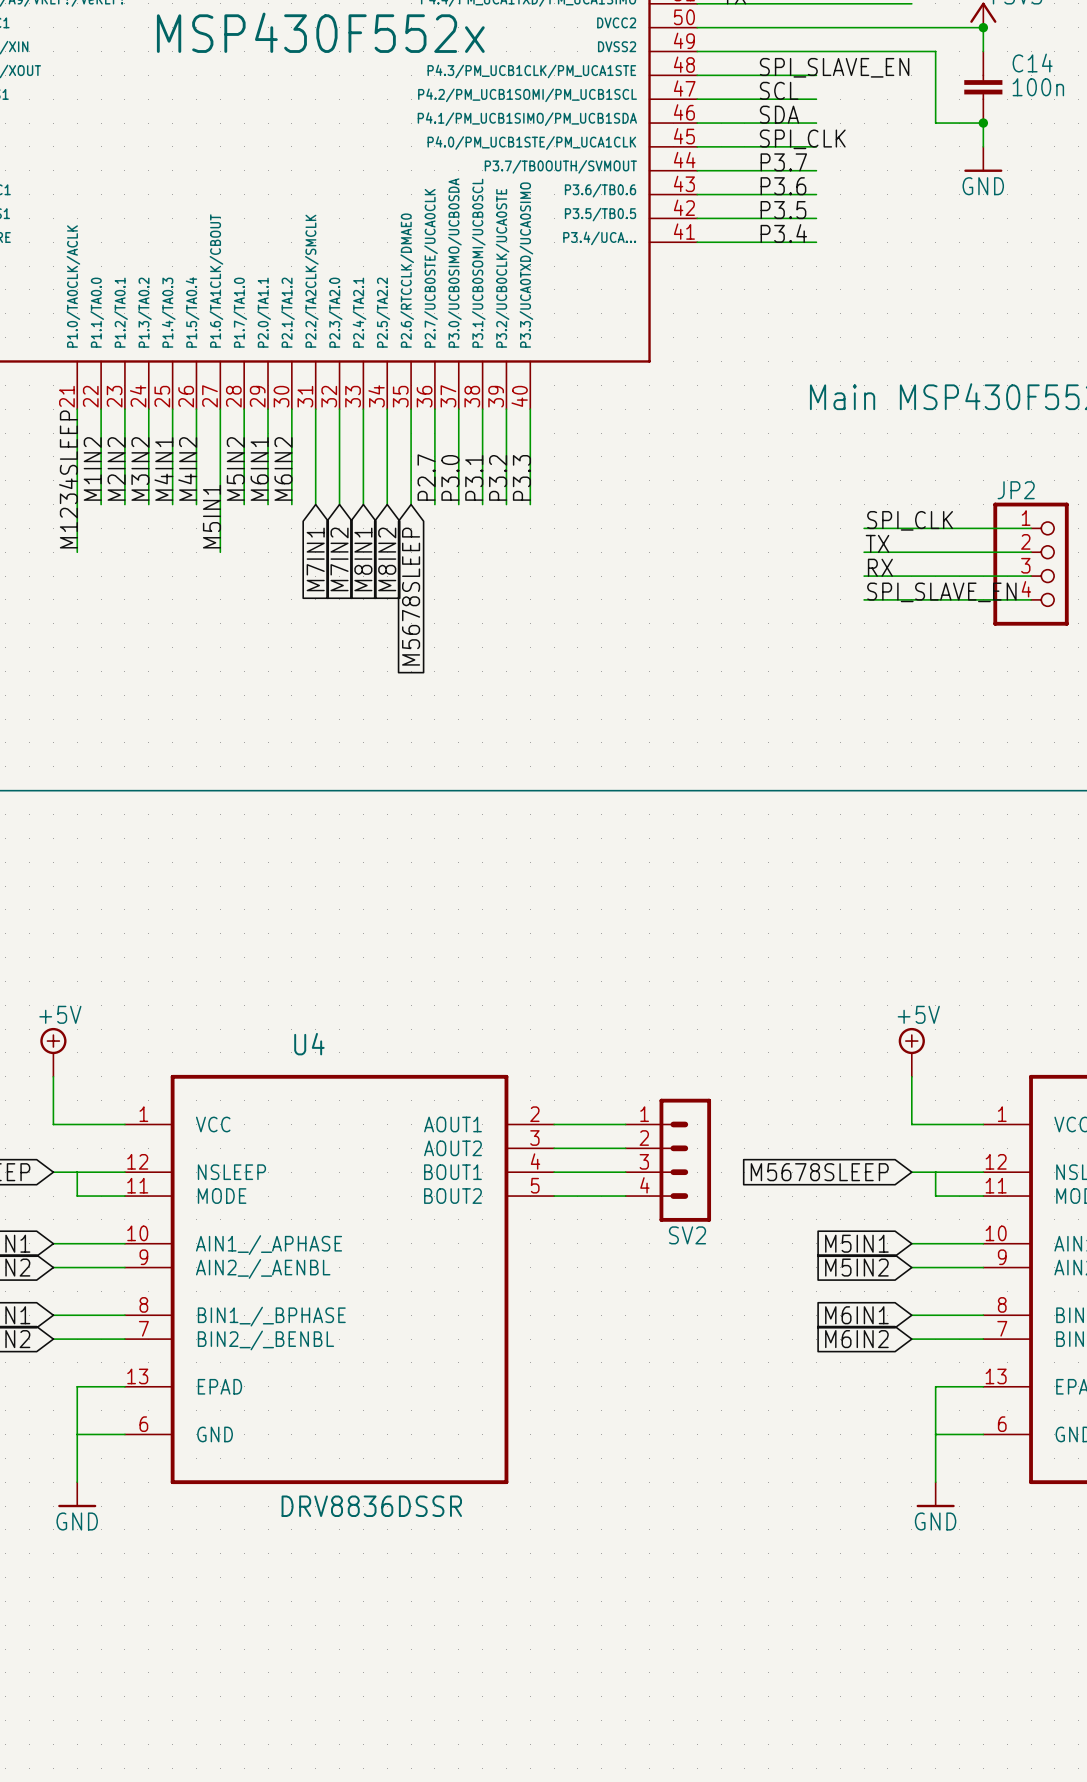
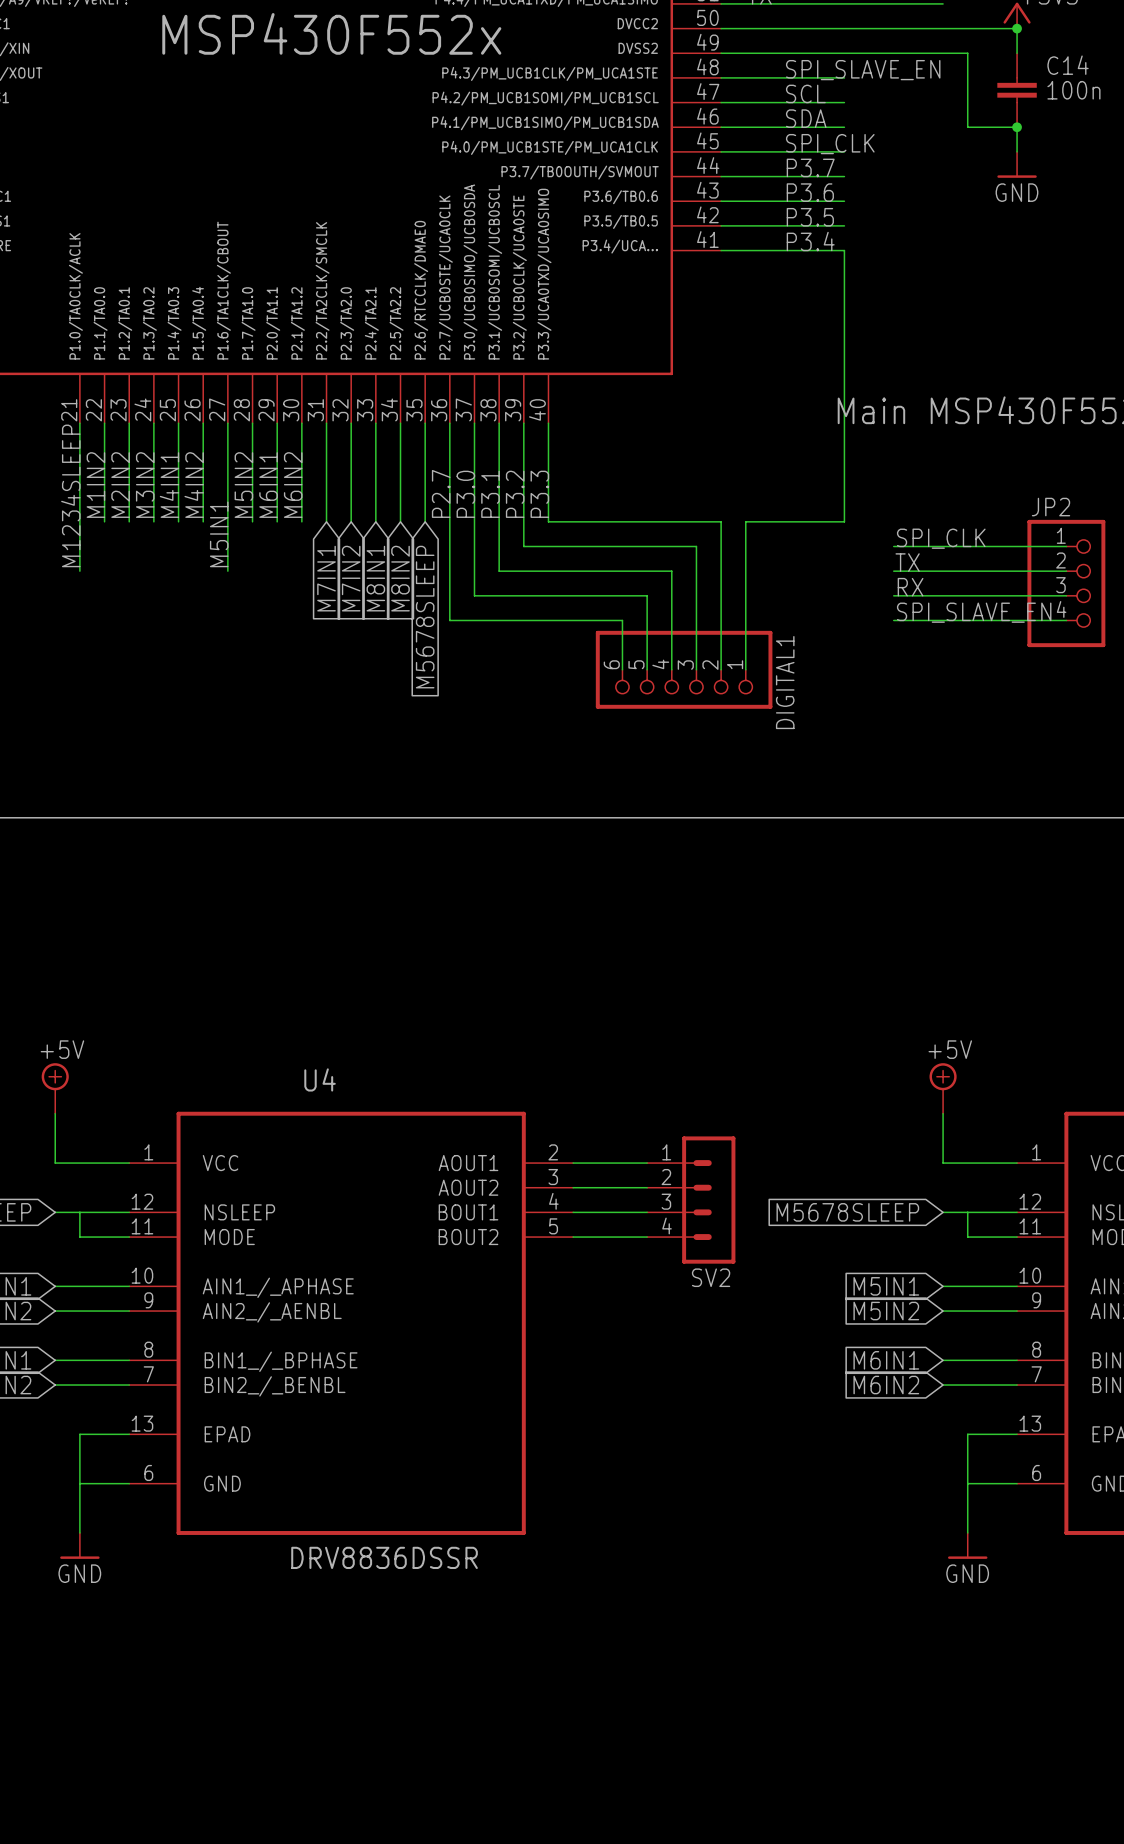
wire: none -> (844, 250) (844, 521) (745, 521) (745, 669)
wire: none -> (449, 521) (449, 620) (622, 620) (622, 669)
wire: none -> (474, 521) (474, 595) (647, 595) (647, 669)
wire: none -> (499, 521) (499, 571) (671, 571) (671, 669)
wire: none -> (523, 521) (523, 546) (696, 546) (696, 669)
wire: none -> (548, 521) (721, 521) (721, 669)
DIGITAL1: none -> (684, 669)

